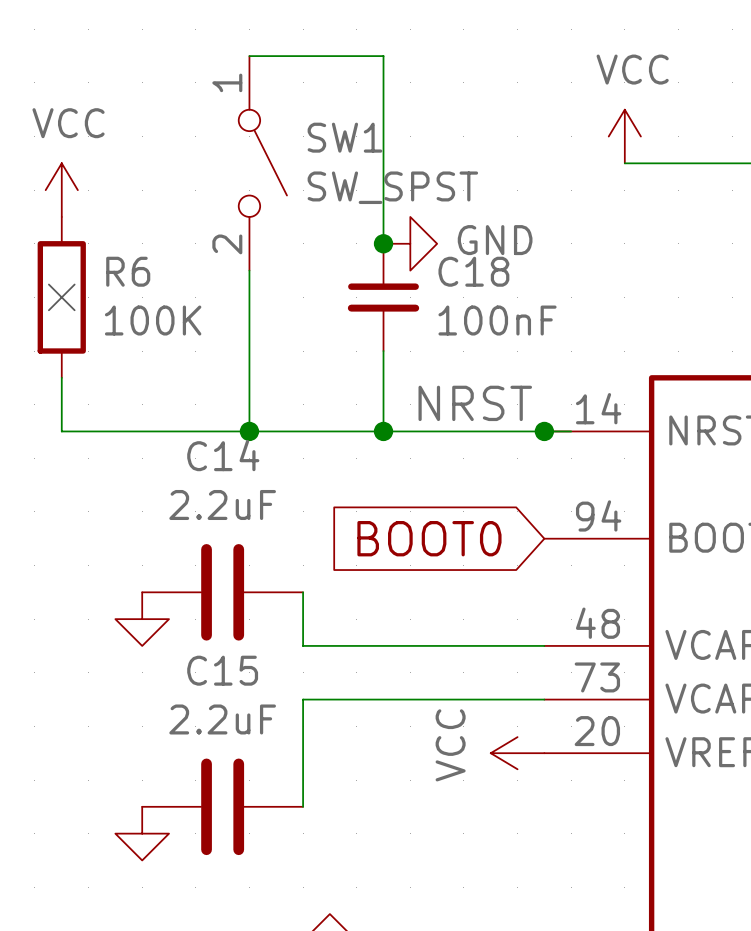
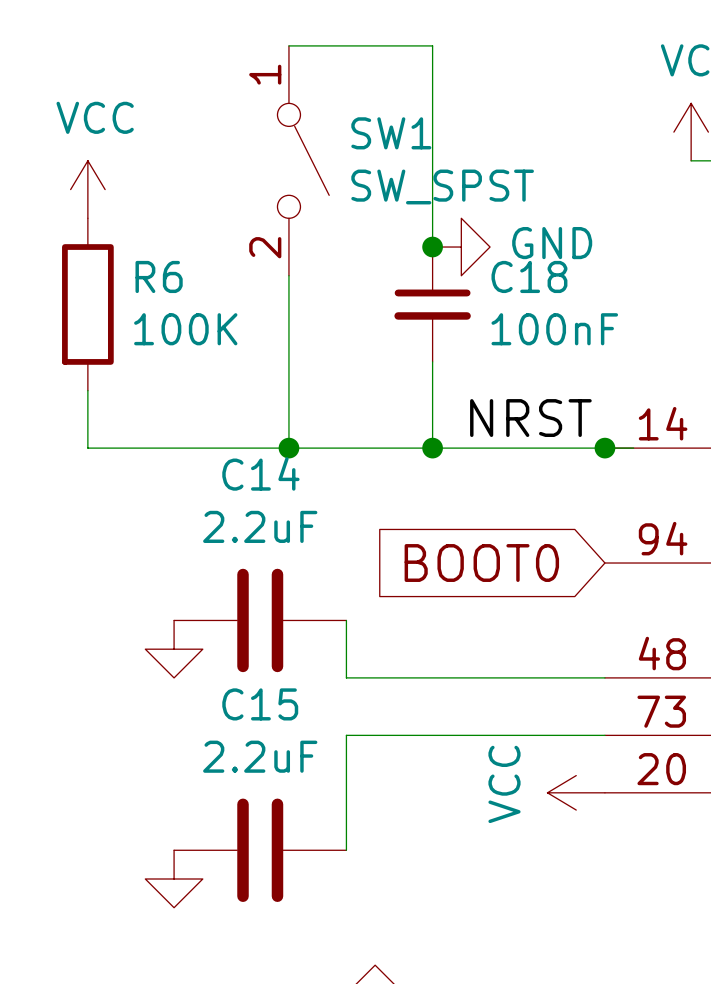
no-connect mark: (61, 297) -> none

